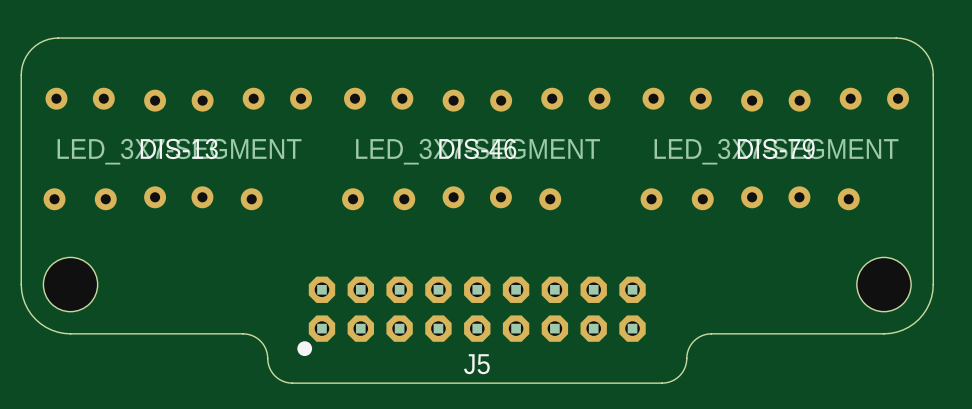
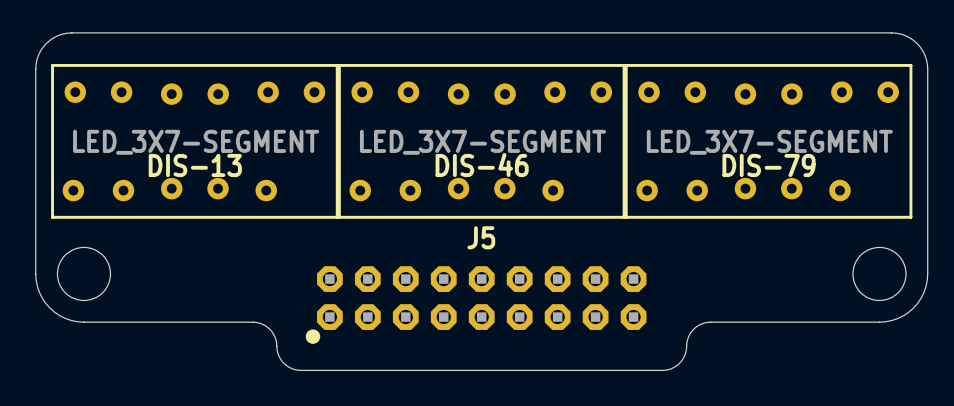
DIS-13 footprint: [43, 87, 312, 211] -> [51, 64, 339, 219]
DIS-46 footprint: [342, 87, 611, 211] -> [337, 64, 626, 219]
DIS-79 footprint: [640, 87, 910, 211] -> [624, 64, 913, 219]
J5 name position: J5 (476, 364) -> J5 (481, 237)

